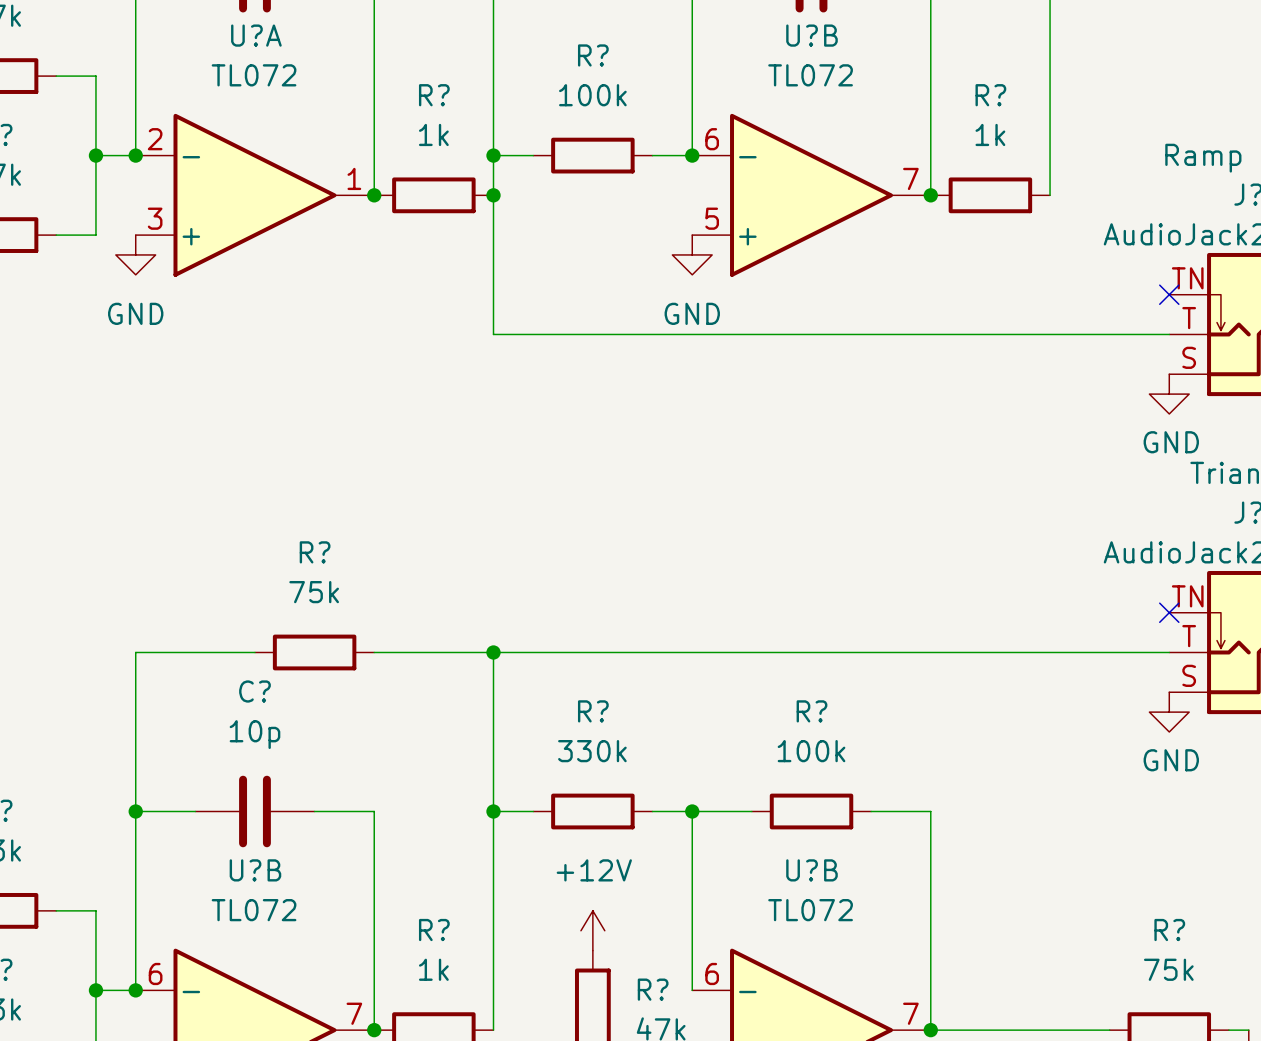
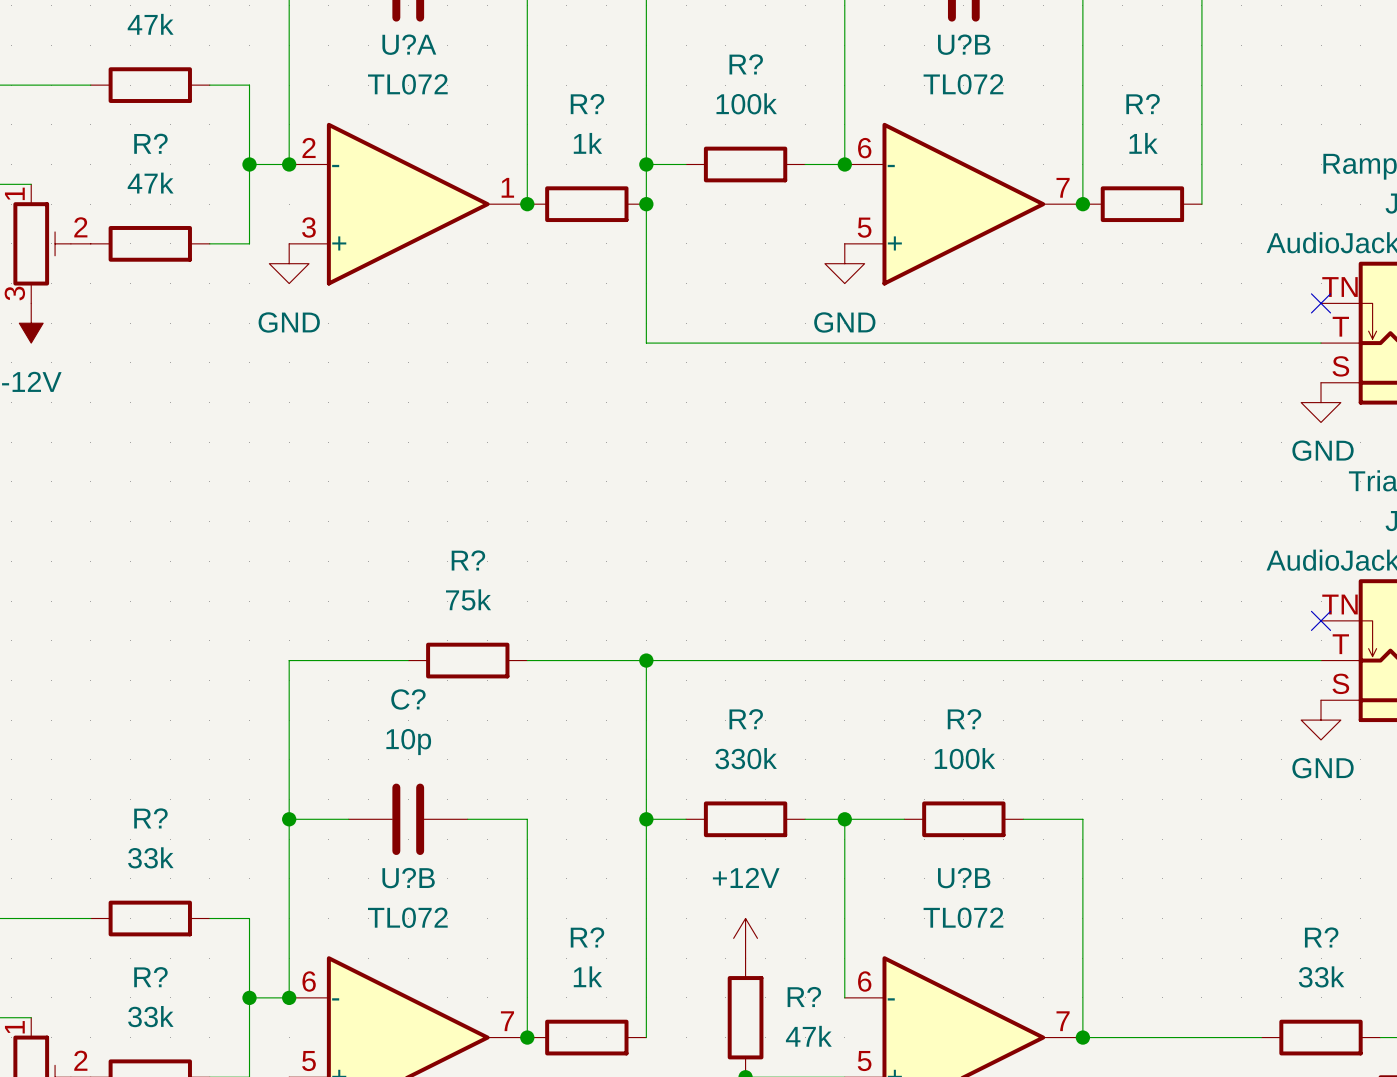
R? value: 75k (1168, 969) -> 33k (1321, 976)

